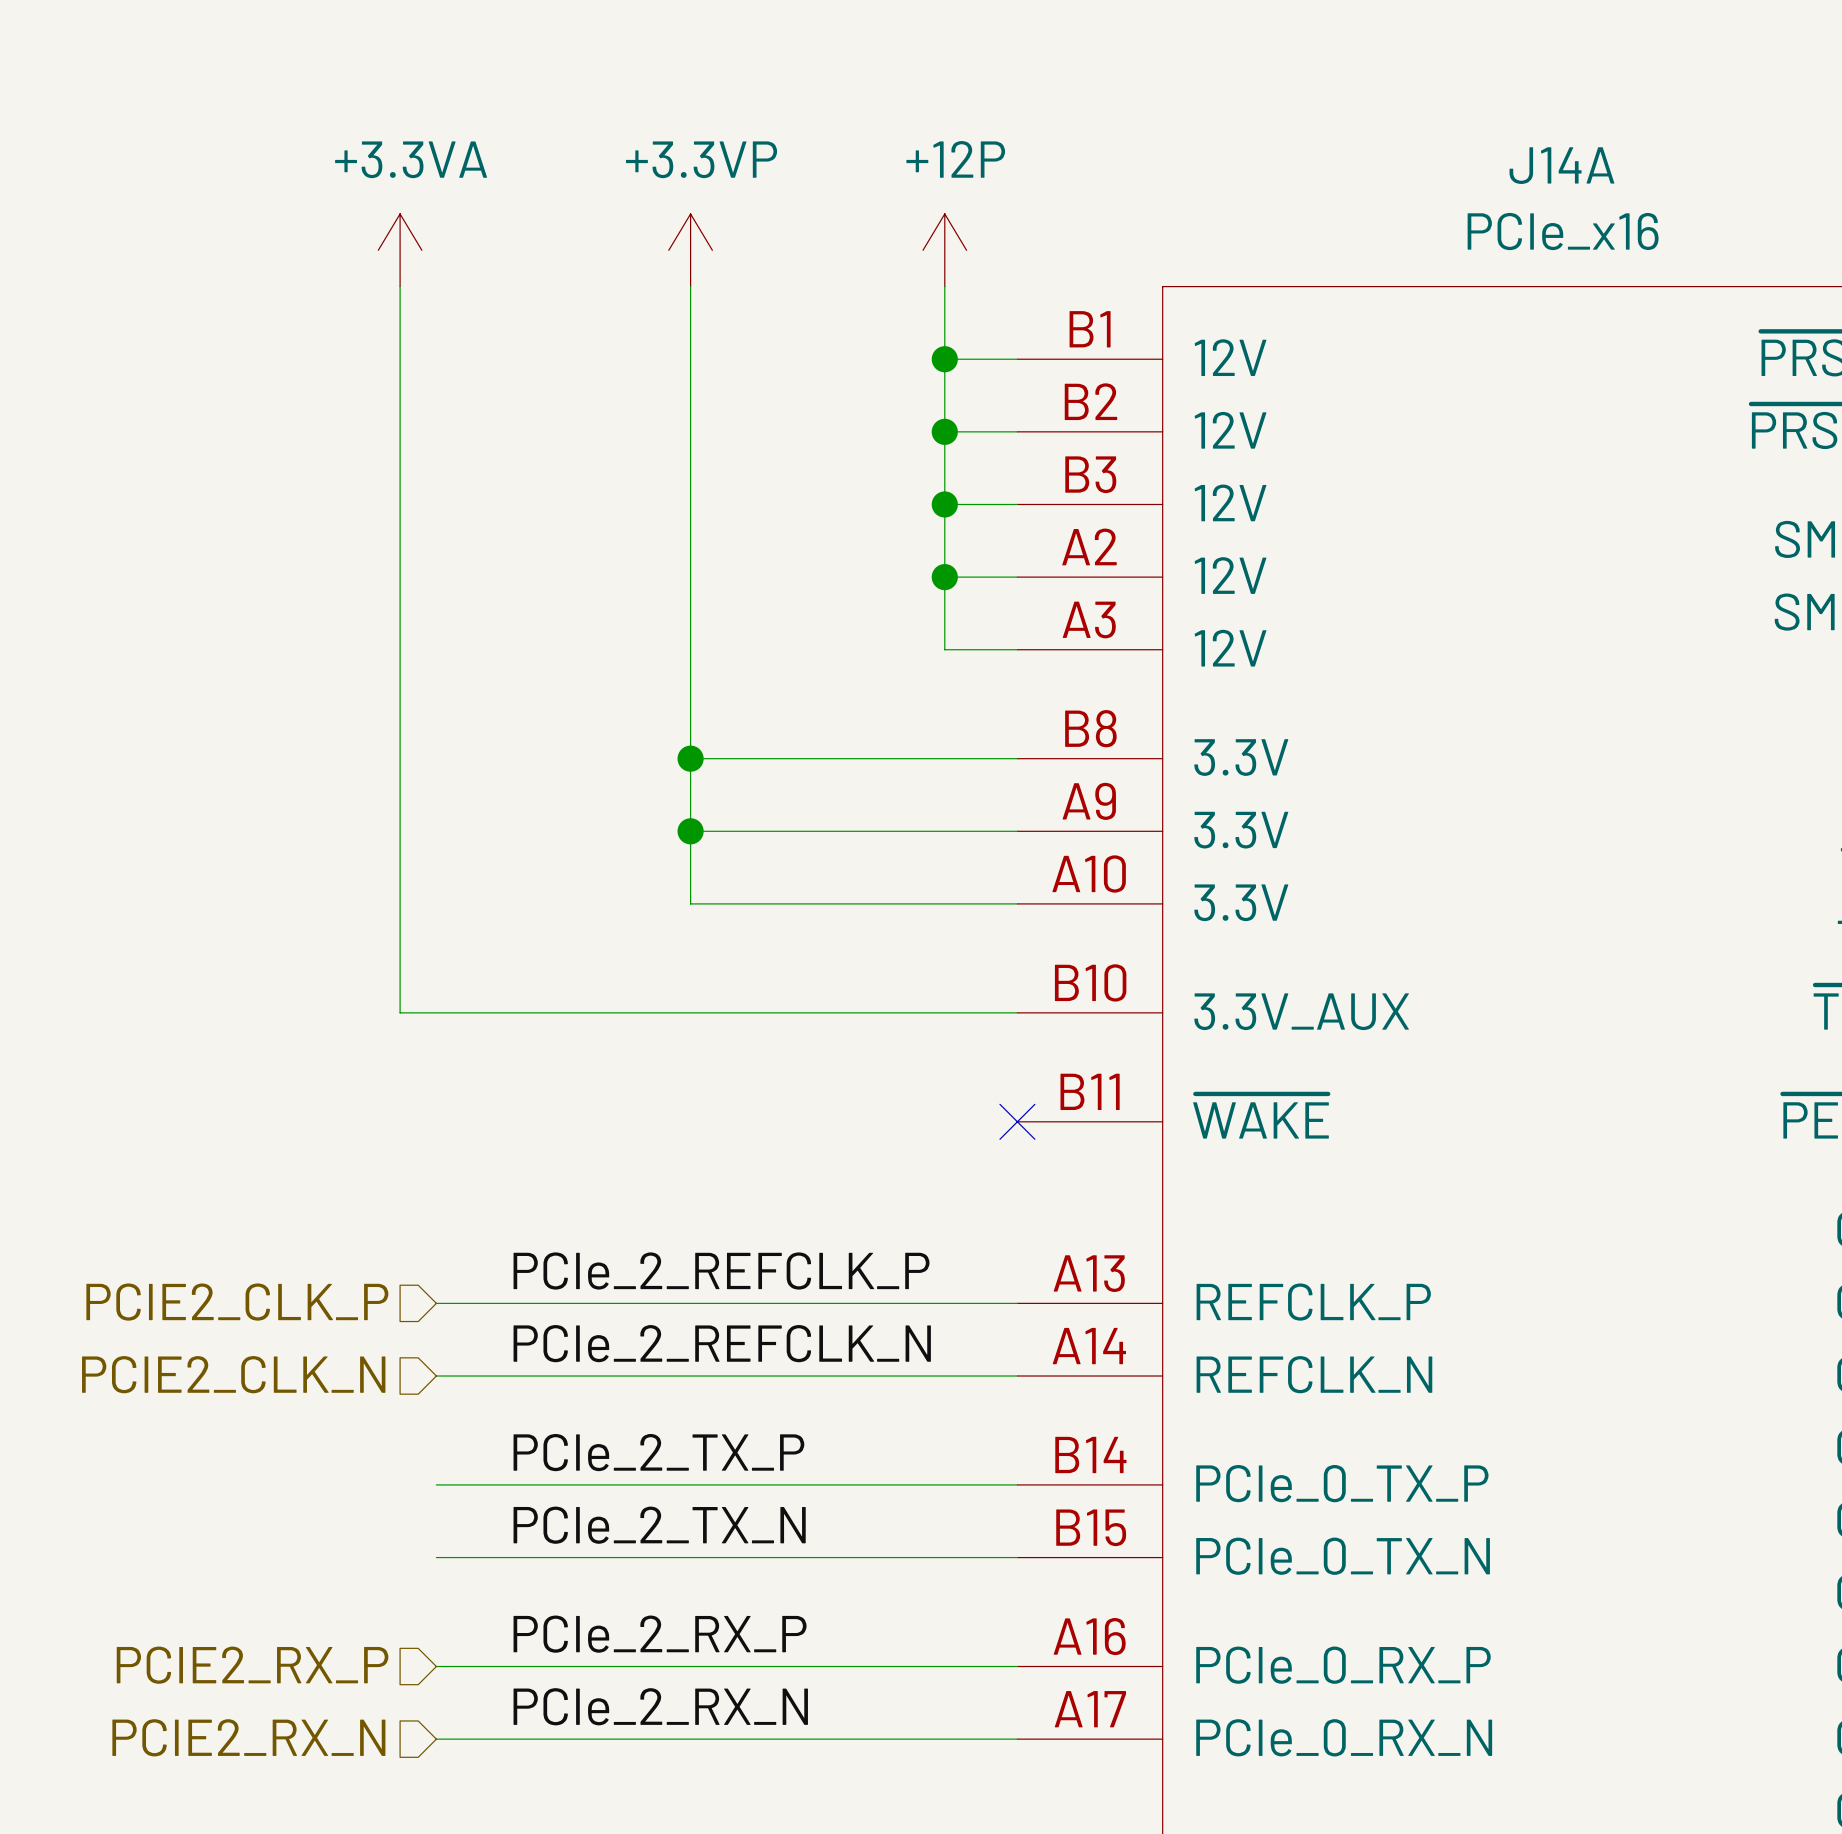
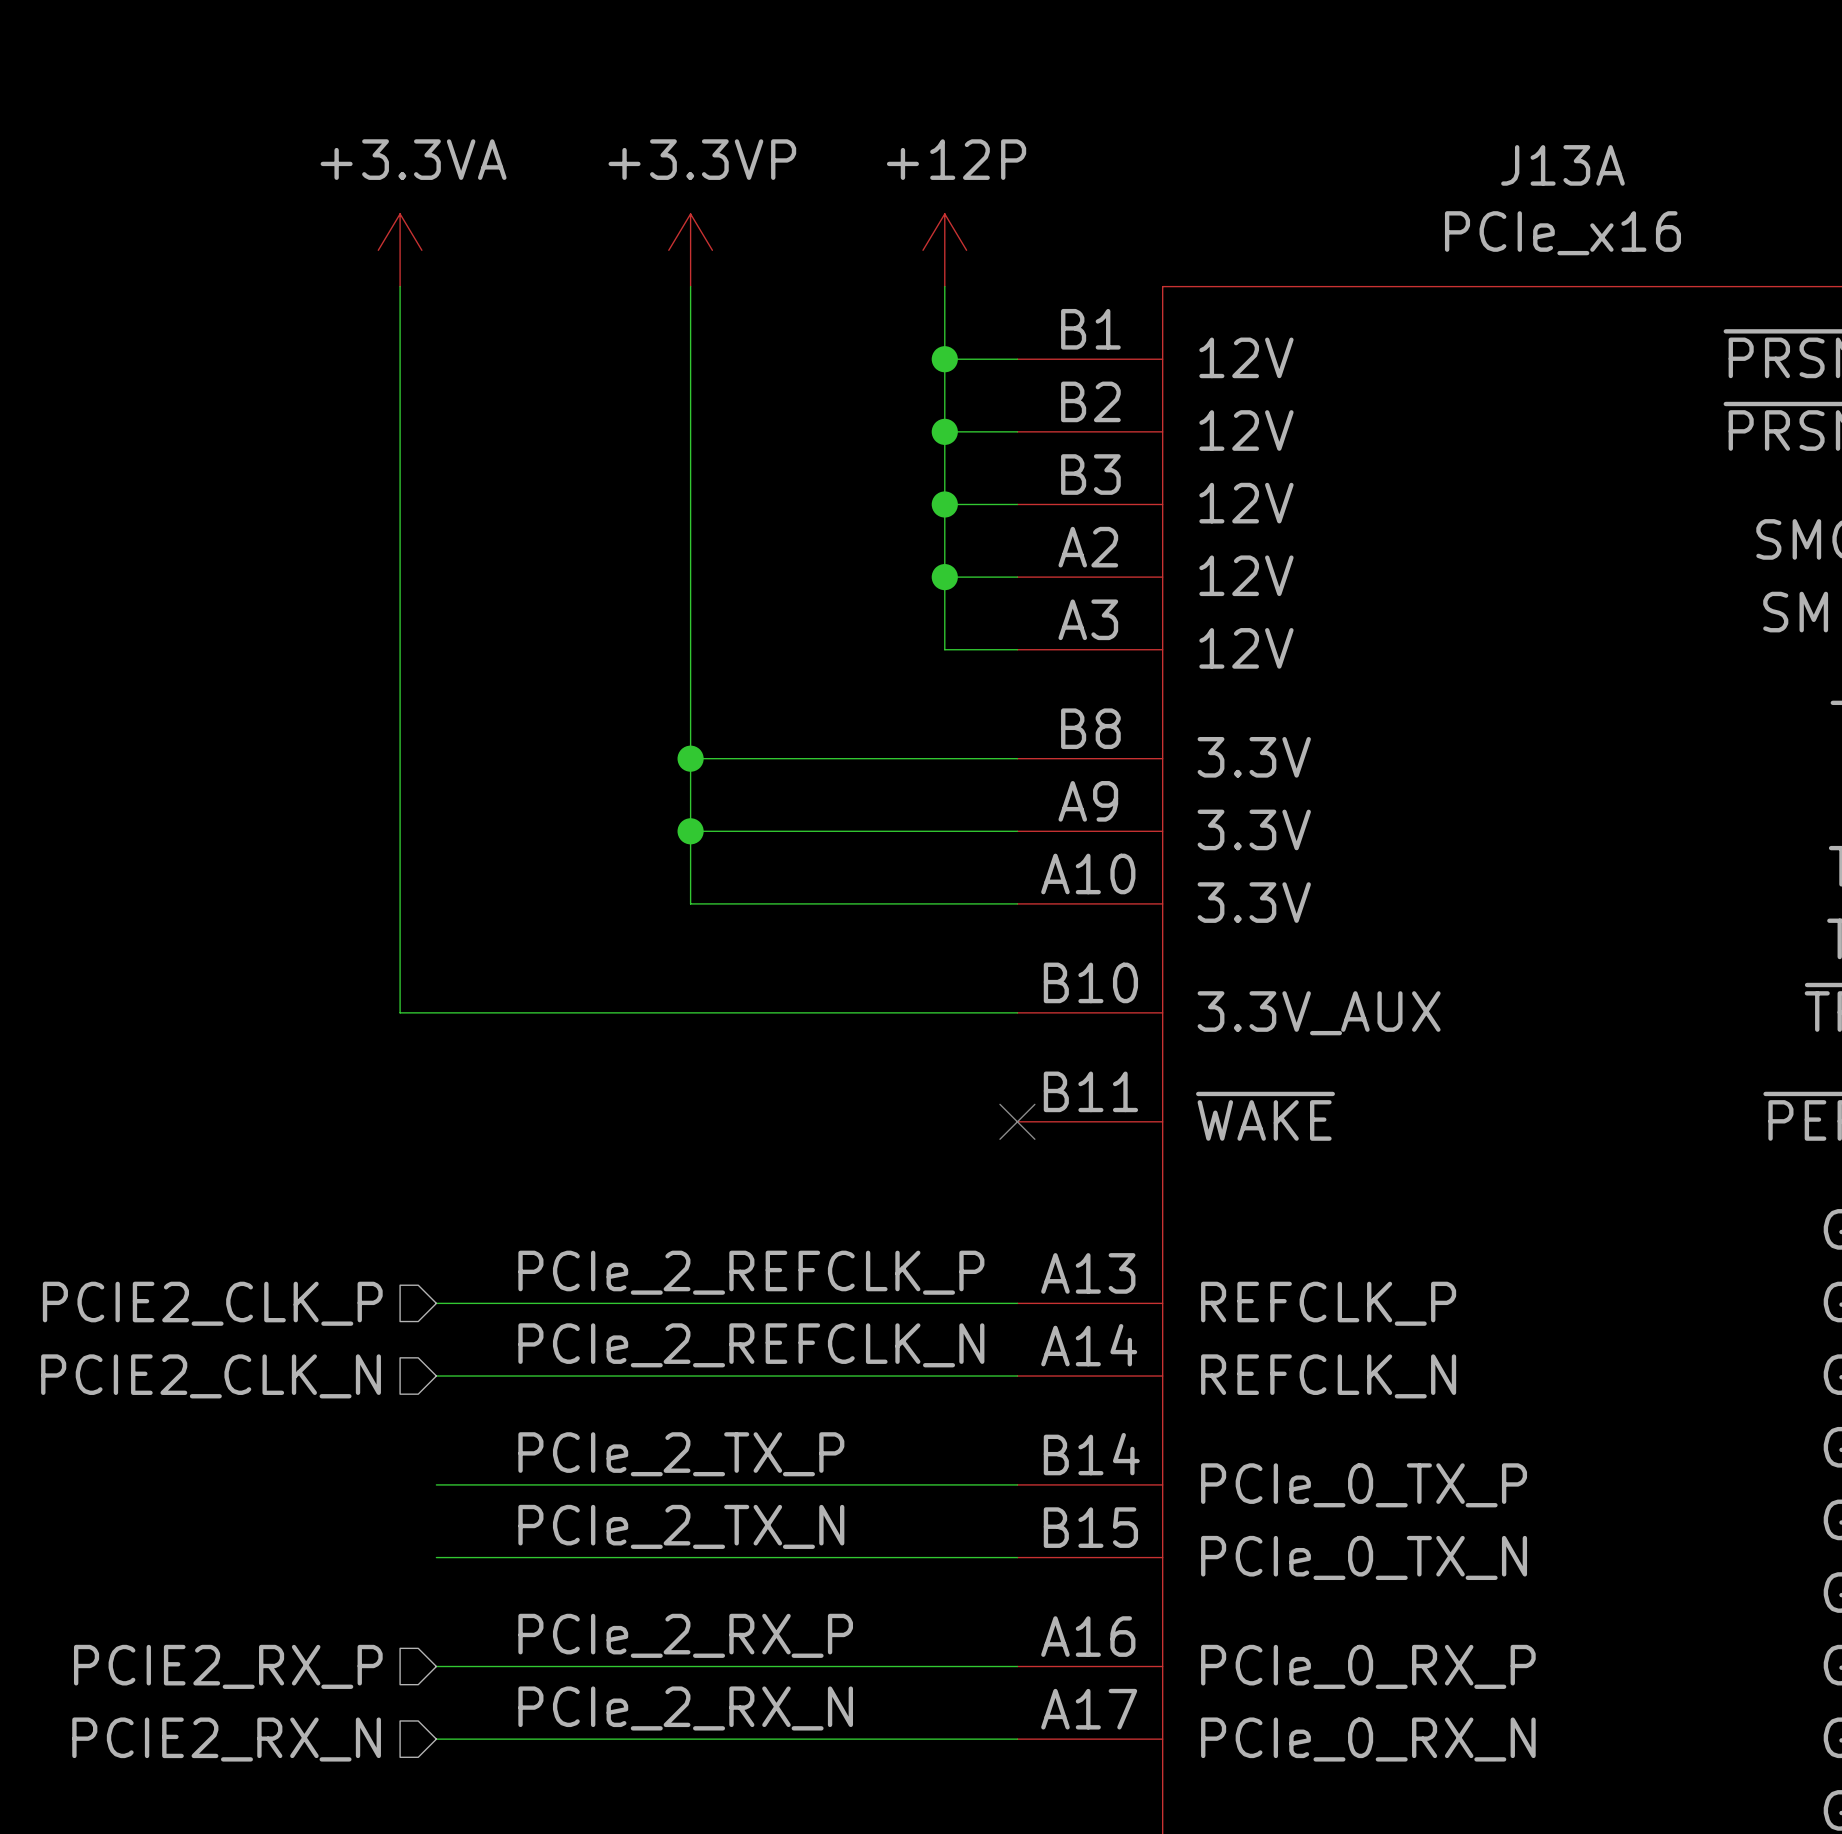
J14A name: J14A (1561, 165) -> J13A (1562, 165)

